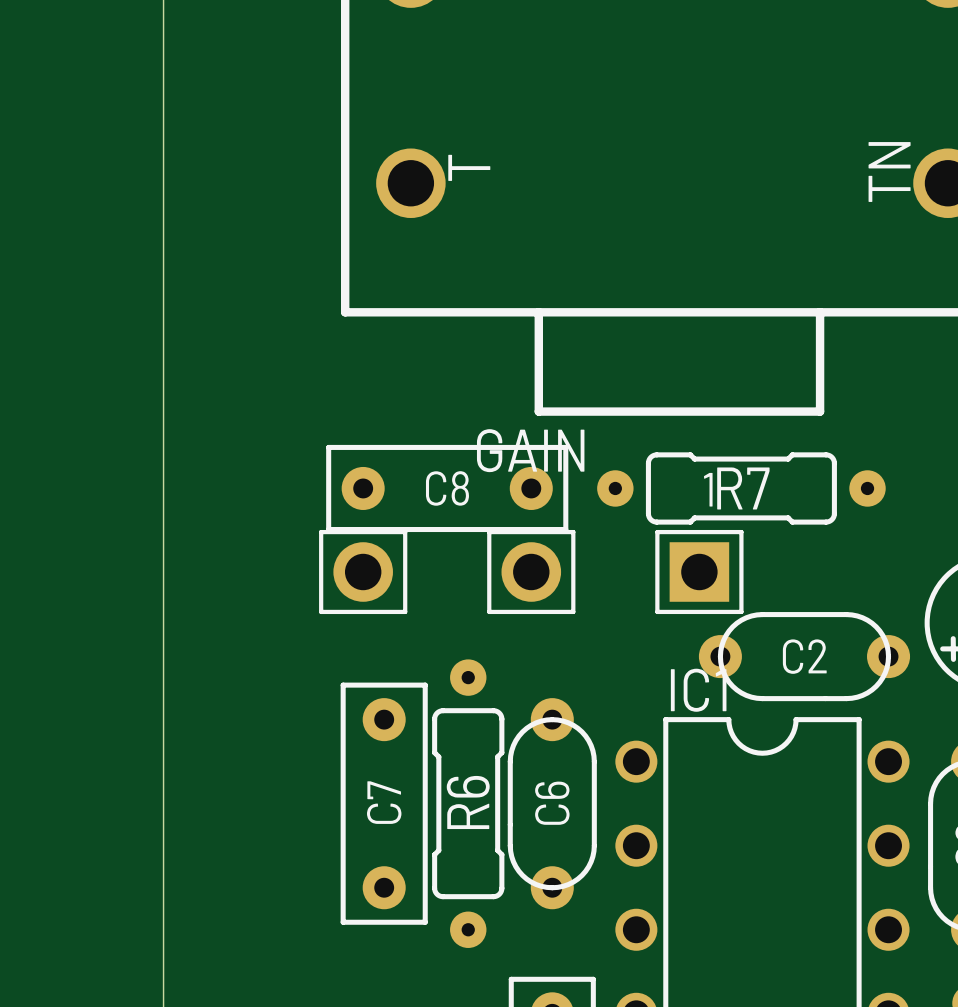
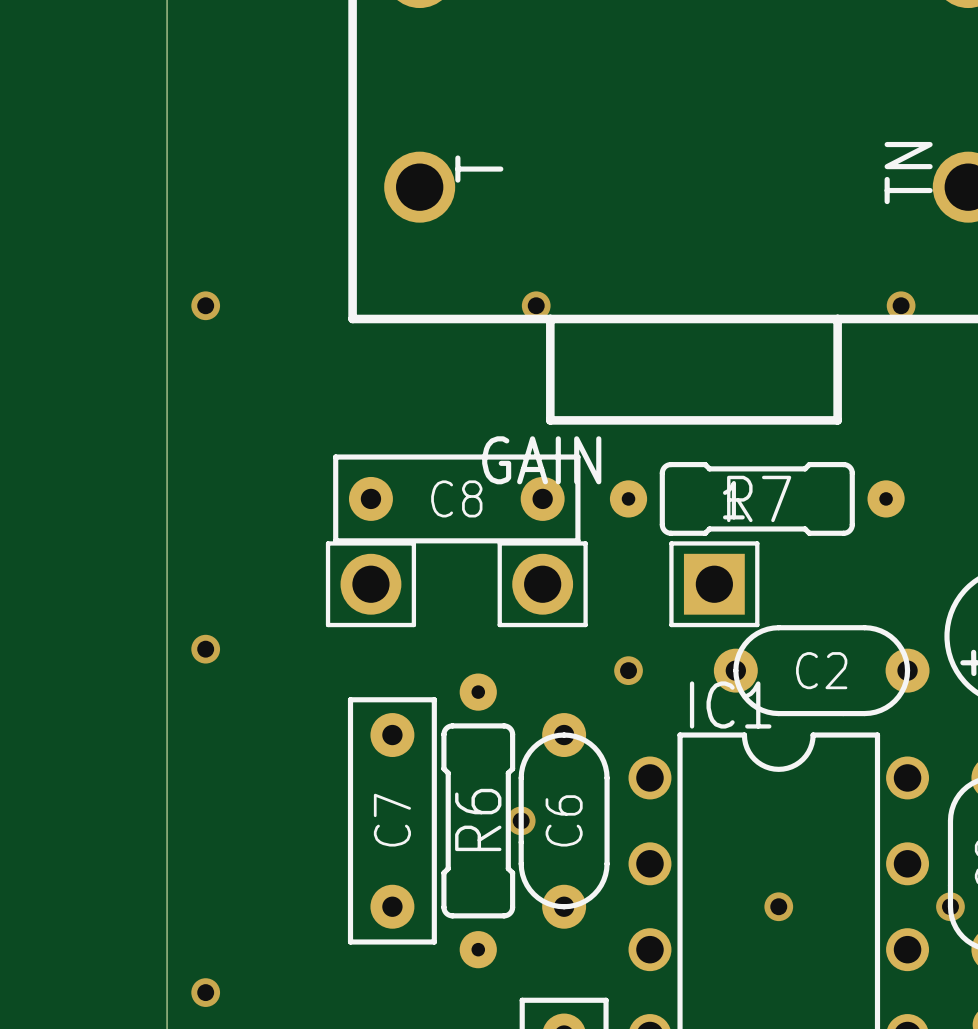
via: none -> (205, 305)
via: none -> (536, 305)
via: none -> (901, 305)
via: none -> (205, 649)
via: none -> (628, 670)
via: none -> (521, 820)
via: none -> (778, 906)
via: none -> (950, 906)
via: none -> (205, 992)

